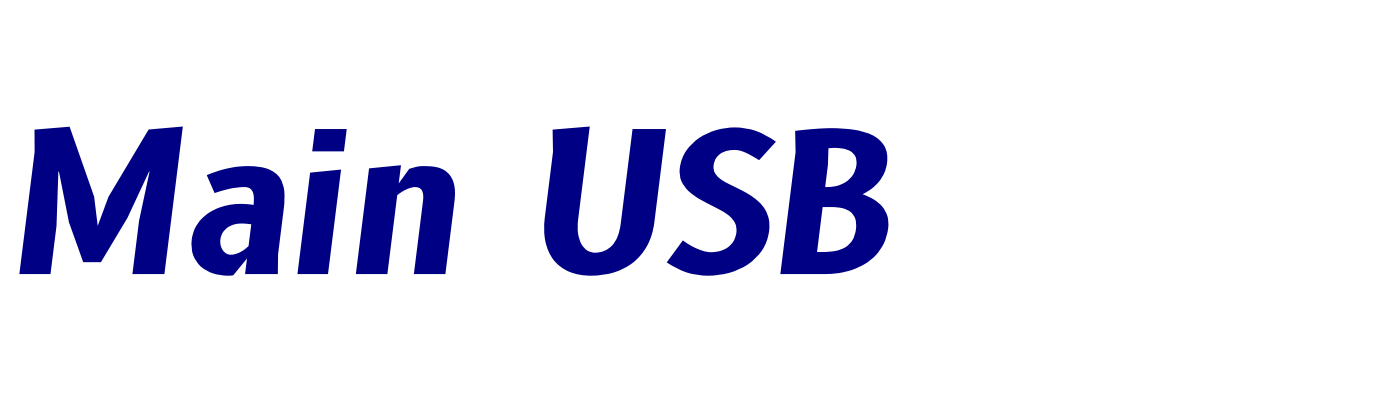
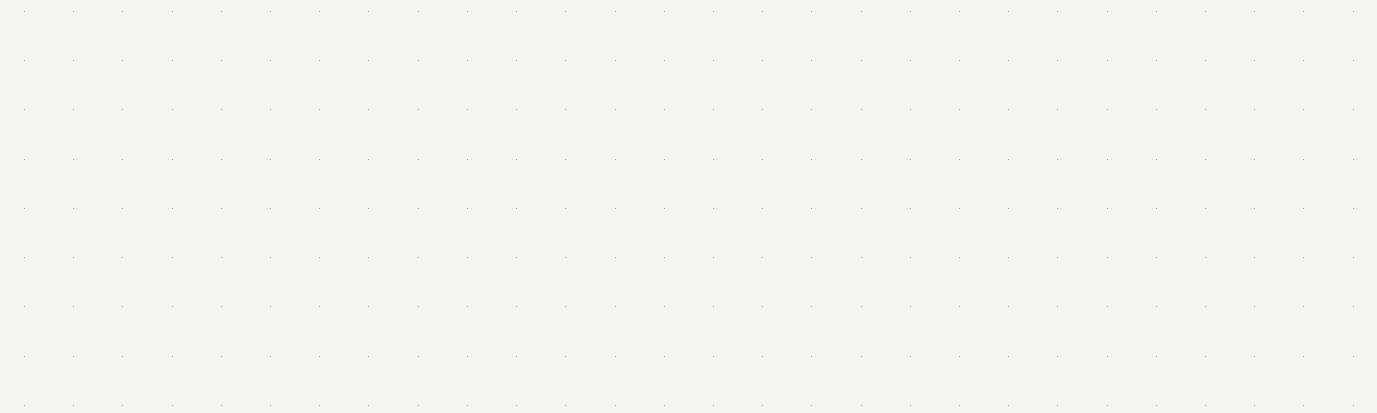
text: Main USB (454, 201) -> none

